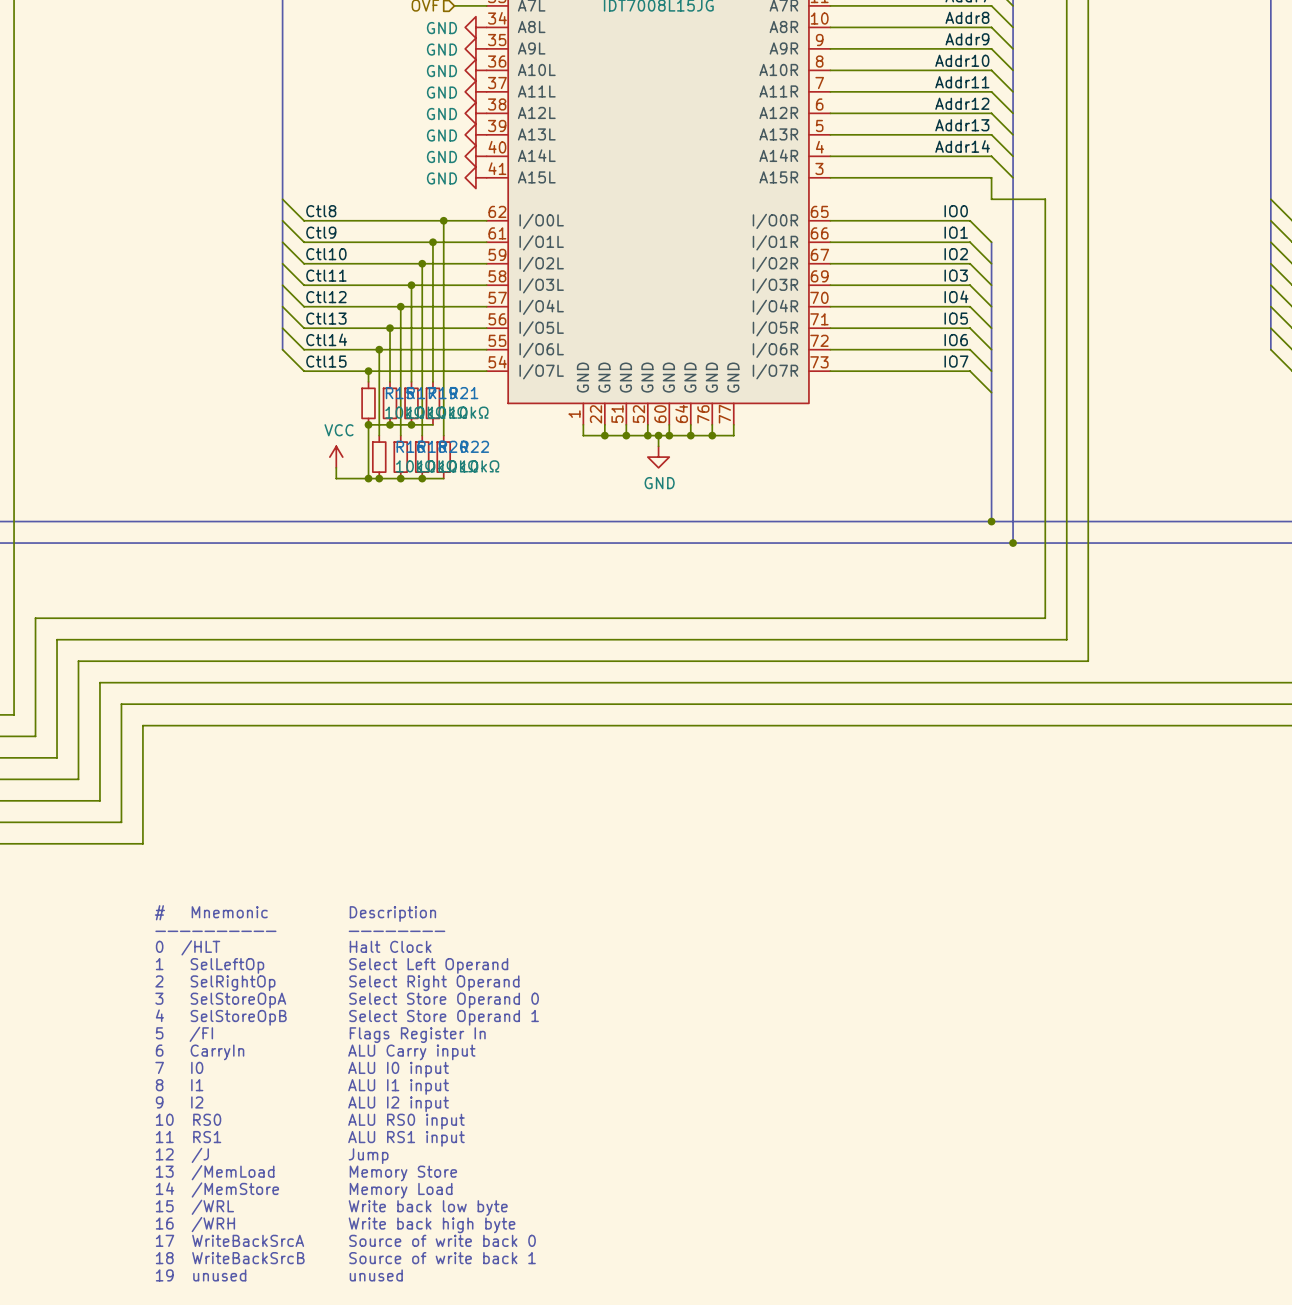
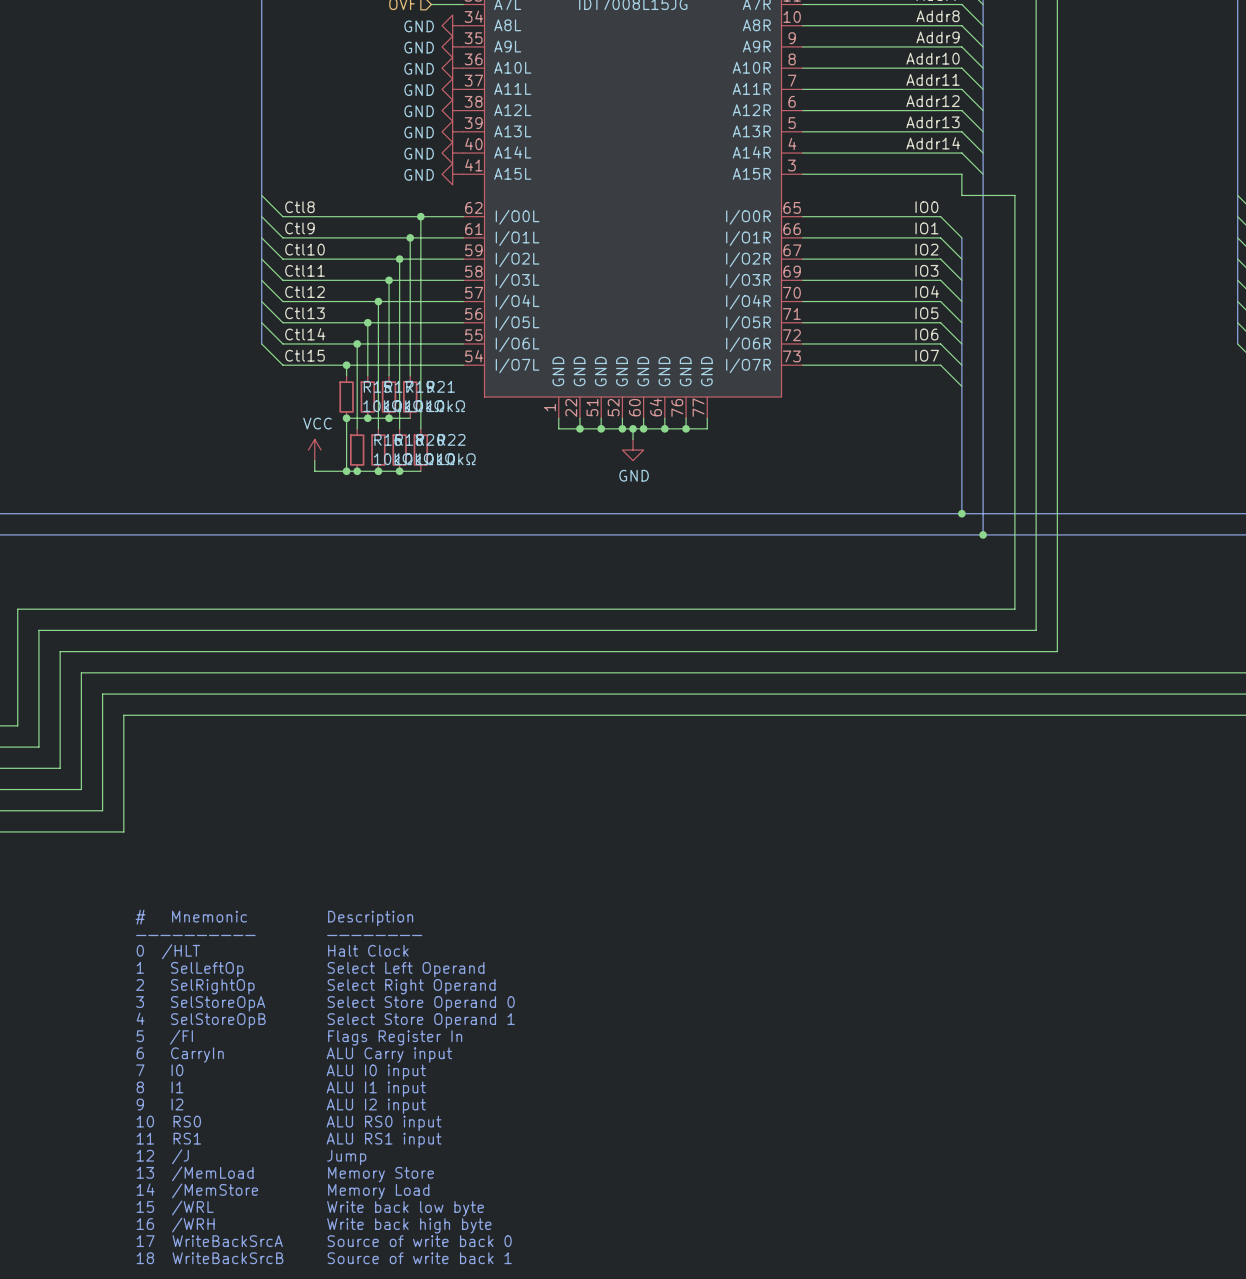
text: # Mnemonic (211, 912) -> none
text: Description (392, 914) -> none
text: —————————— (215, 931) -> # Mnemonic (191, 917)
text: ———————— (397, 931) -> Description (370, 918)
text: Halt Clock (390, 946) -> ———————— (374, 935)
text: 0 /HLT (188, 947) -> —————————— (195, 935)
text: 1 SelLeftOp (210, 965) -> 0 /HLT (168, 951)
text: Select Left Operand (428, 965) -> Halt Clock (368, 950)
text: 2 SelRightOp (215, 983) -> 1 SelLeftOp (190, 969)
text: Select Right Operand (434, 983) -> Select Left Operand (406, 969)
text: 3 SelStoreOpA (220, 1000) -> 2 SelRightOp (195, 986)
text: Select Store Operand 0 (444, 1000) -> Select Right Operand (411, 986)
text: 4 SelStoreOpB (221, 1017) -> 3 SelStoreOpA (200, 1003)
text: Select Store Operand 1 (444, 1017) -> Select Store Operand 0 (421, 1003)
text: 5 /FI (184, 1034) -> 4 SelStoreOpB (201, 1020)
text: Flags Register In (417, 1035) -> Select Store Operand 1 (421, 1020)
text: 6 CarryIn (200, 1052) -> 5 /FI (164, 1037)
text: ALU Carry input (411, 1052) -> Flags Register In (395, 1037)
text: 7 I0 (179, 1067) -> 6 CarryIn (180, 1055)
text: ALU I0 input (398, 1069) -> ALU Carry input (389, 1055)
text: 8 I1 (179, 1085) -> 7 I0 (159, 1070)
text: ALU I1 input (398, 1086) -> ALU I0 input (376, 1072)
text: 9 I2 (179, 1102) -> 8 I1 (160, 1087)
text: ALU I2 input (398, 1104) -> ALU I1 input (376, 1089)
text: 10 RS0 (188, 1119) -> 9 I2 (160, 1104)
text: ALU RS0 input (406, 1121) -> ALU I2 input (376, 1106)
text: 11 RS1 (188, 1137) -> 10 RS0 (168, 1121)
text: ALU RS1 input (406, 1138) -> ALU RS0 input (384, 1123)
text: 12 /J (182, 1155) -> 11 RS1 (168, 1138)
text: Jump (368, 1156) -> ALU RS1 input (384, 1140)
text: 13 /MemLoad (215, 1172) -> 12 /J (162, 1156)
text: Memory Store (403, 1173) -> Jump (346, 1157)
text: 14 /MemStore (217, 1189) -> 13 /MemLoad (195, 1173)
text: Memory Load (401, 1190) -> Memory Store (381, 1174)
text: 15 /WRL (194, 1207) -> 14 /MemStore (197, 1190)
text: Write back low byte (428, 1208) -> Memory Load (378, 1191)
text: 16 /WRH (195, 1224) -> 15 /WRL (175, 1207)
text: Write back high byte (432, 1225) -> Write back low byte (405, 1208)
text: 17 WriteBackSrcA (229, 1240) -> 16 /WRH (175, 1225)
text: Source of write back 0 (442, 1240) -> Write back high byte (409, 1225)
text: 18 WriteBackSrcB (230, 1258) -> 17 WriteBackSrcA (209, 1241)
text: Source of write back 1 (442, 1258) -> Source of write back 0 (419, 1241)
text: 19 unused (201, 1275) -> 18 WriteBackSrcB (210, 1258)
text: unused (376, 1275) -> Source of write back 1 (419, 1258)

